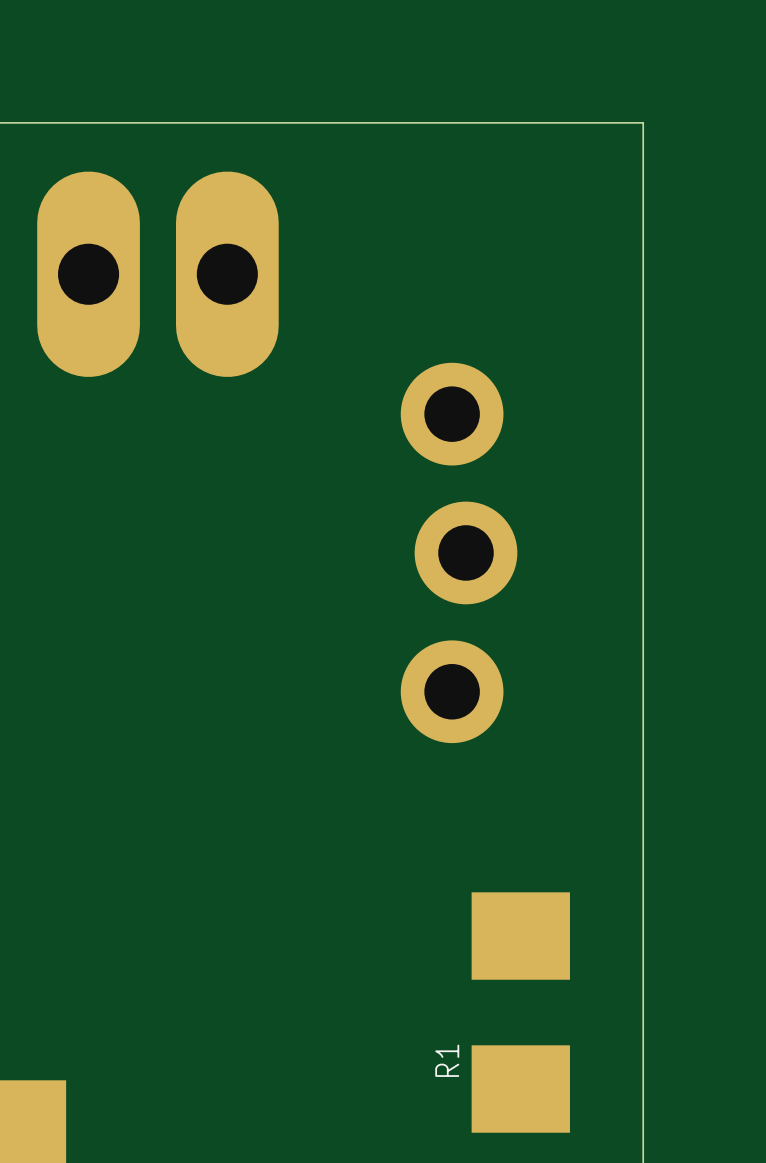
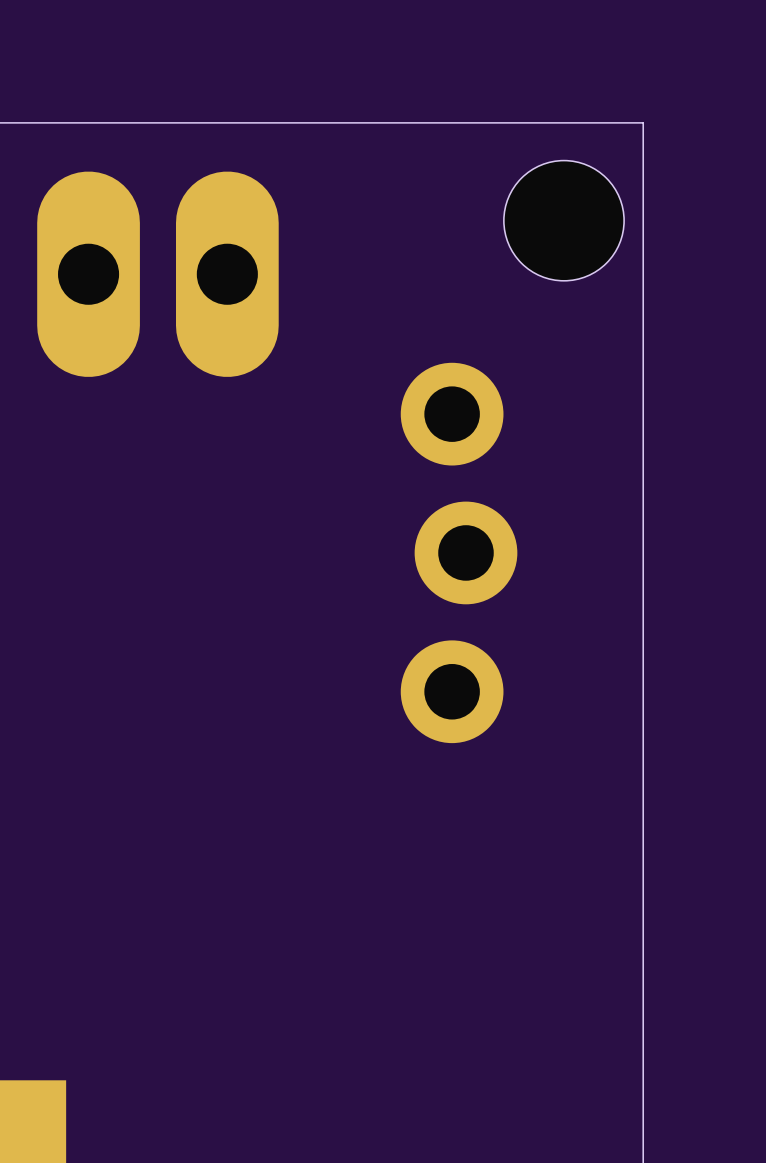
hole: none -> (563, 220)
R1: (520, 1012) -> none

